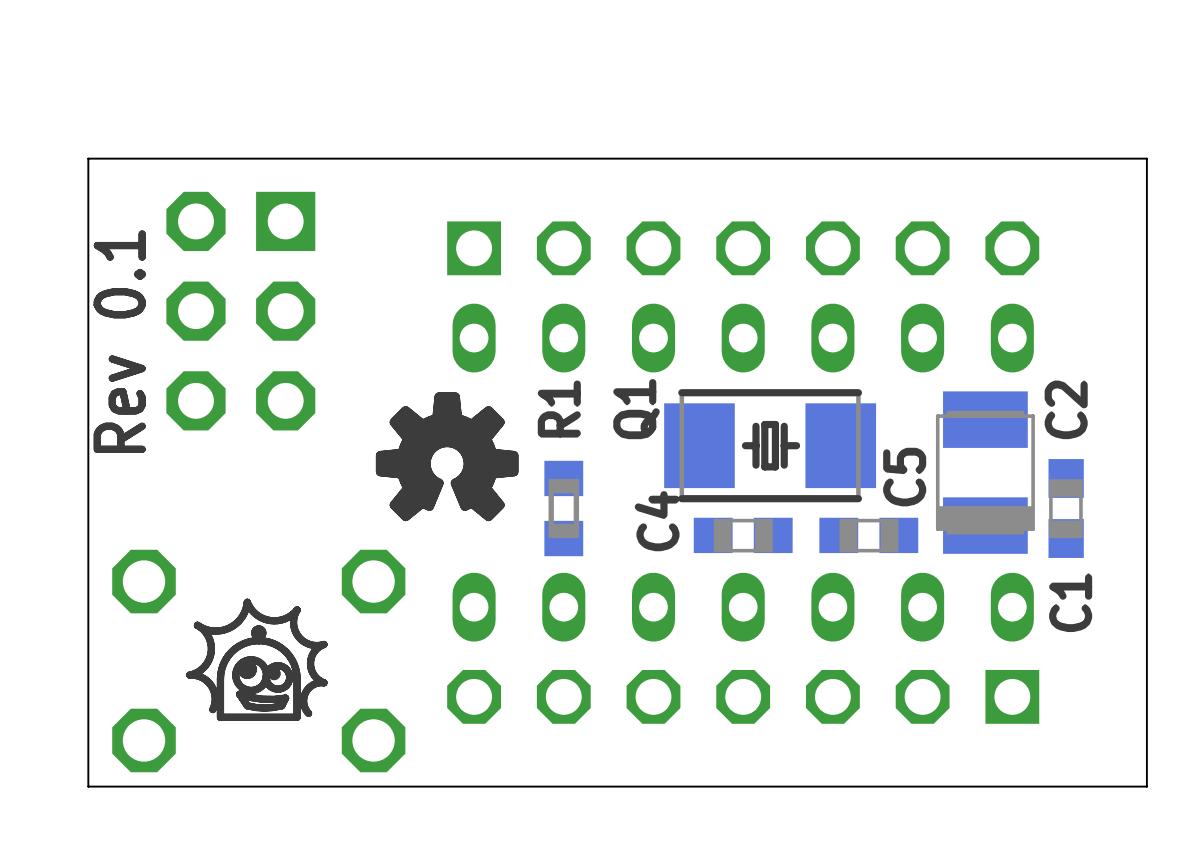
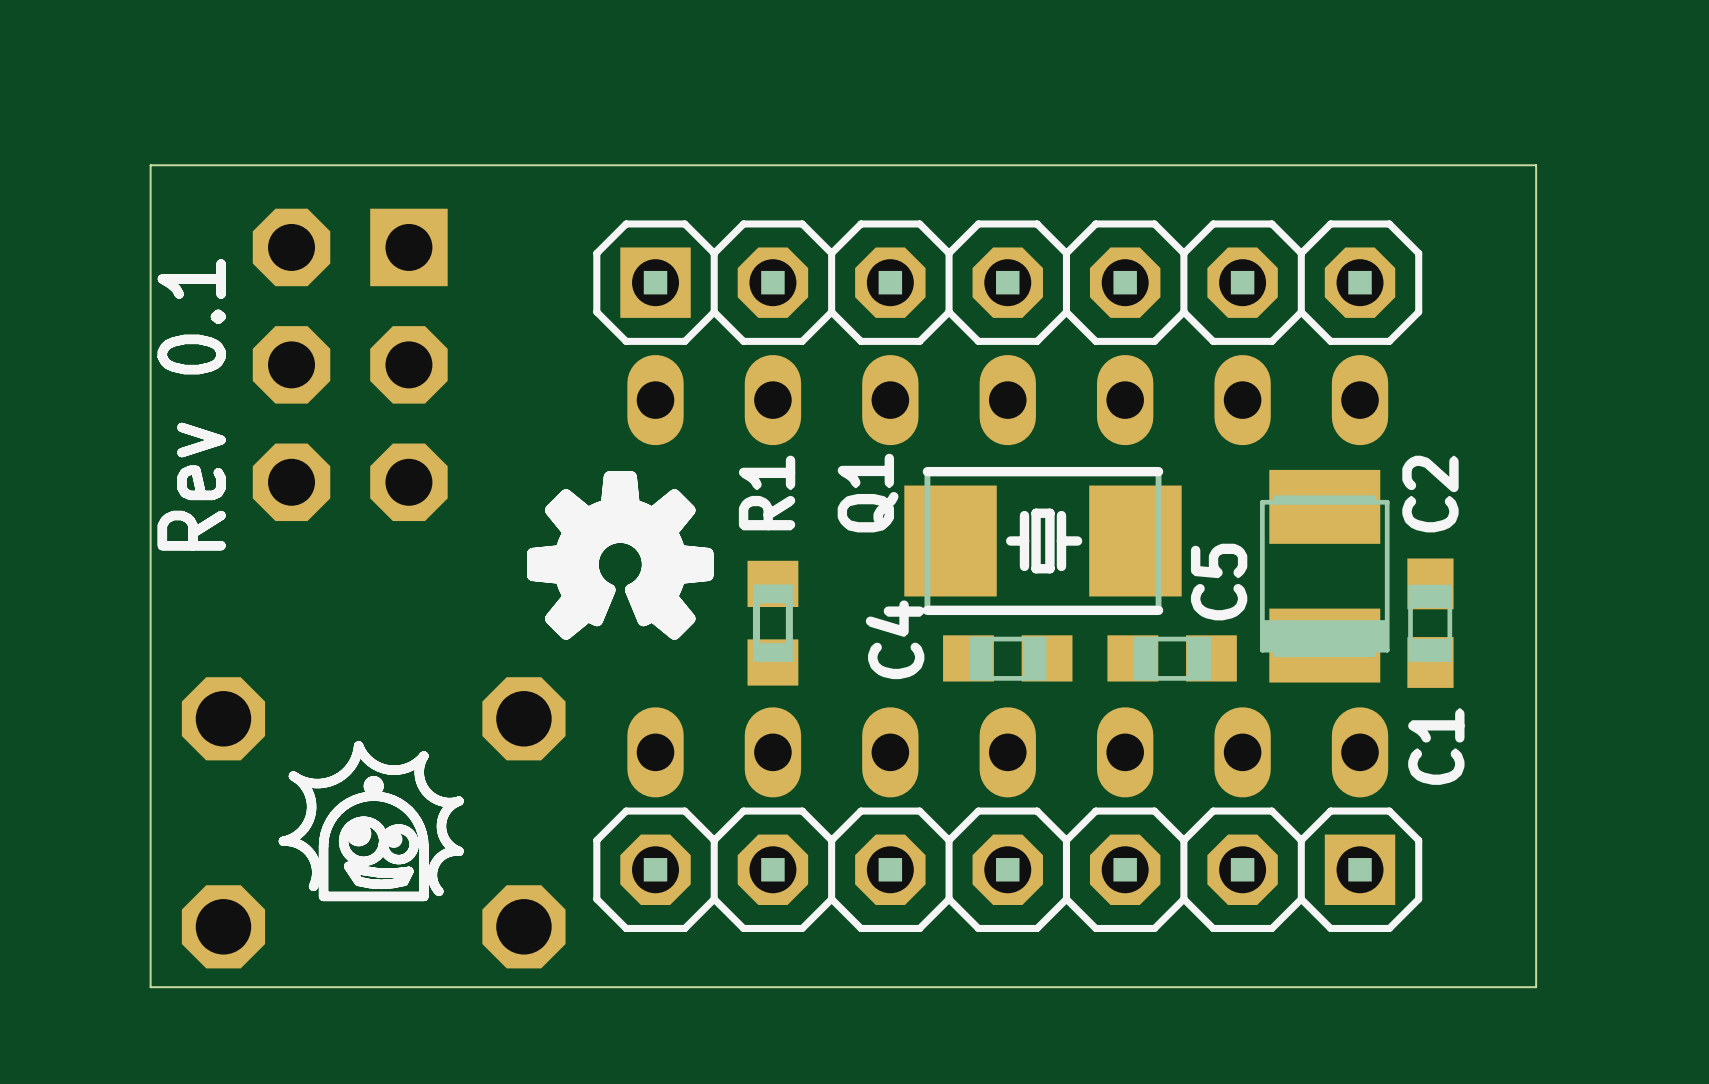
part side: top (743, 248) -> bottom (1007, 282)
part side: top (743, 696) -> bottom (1007, 869)

